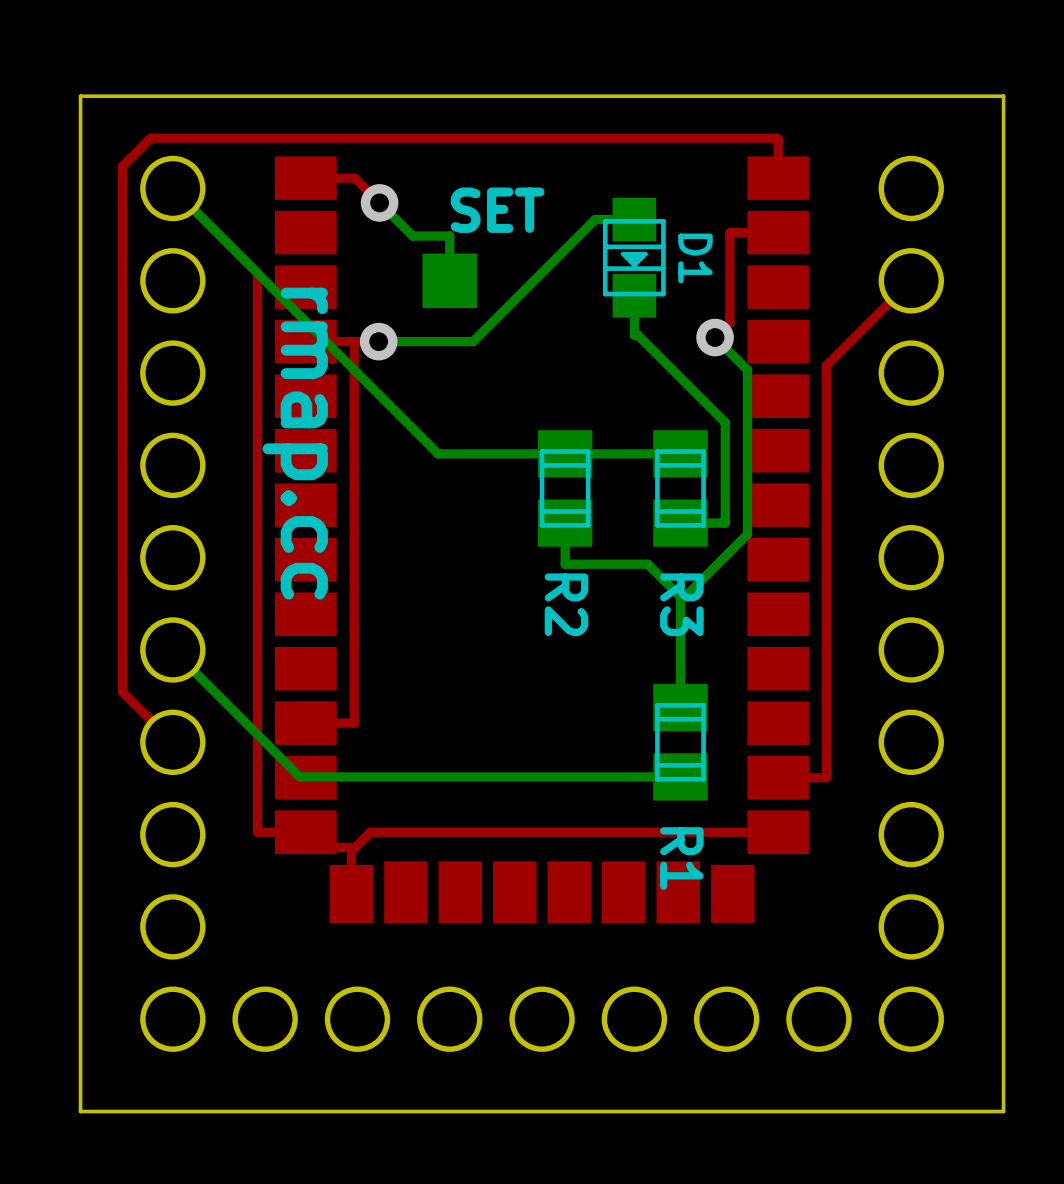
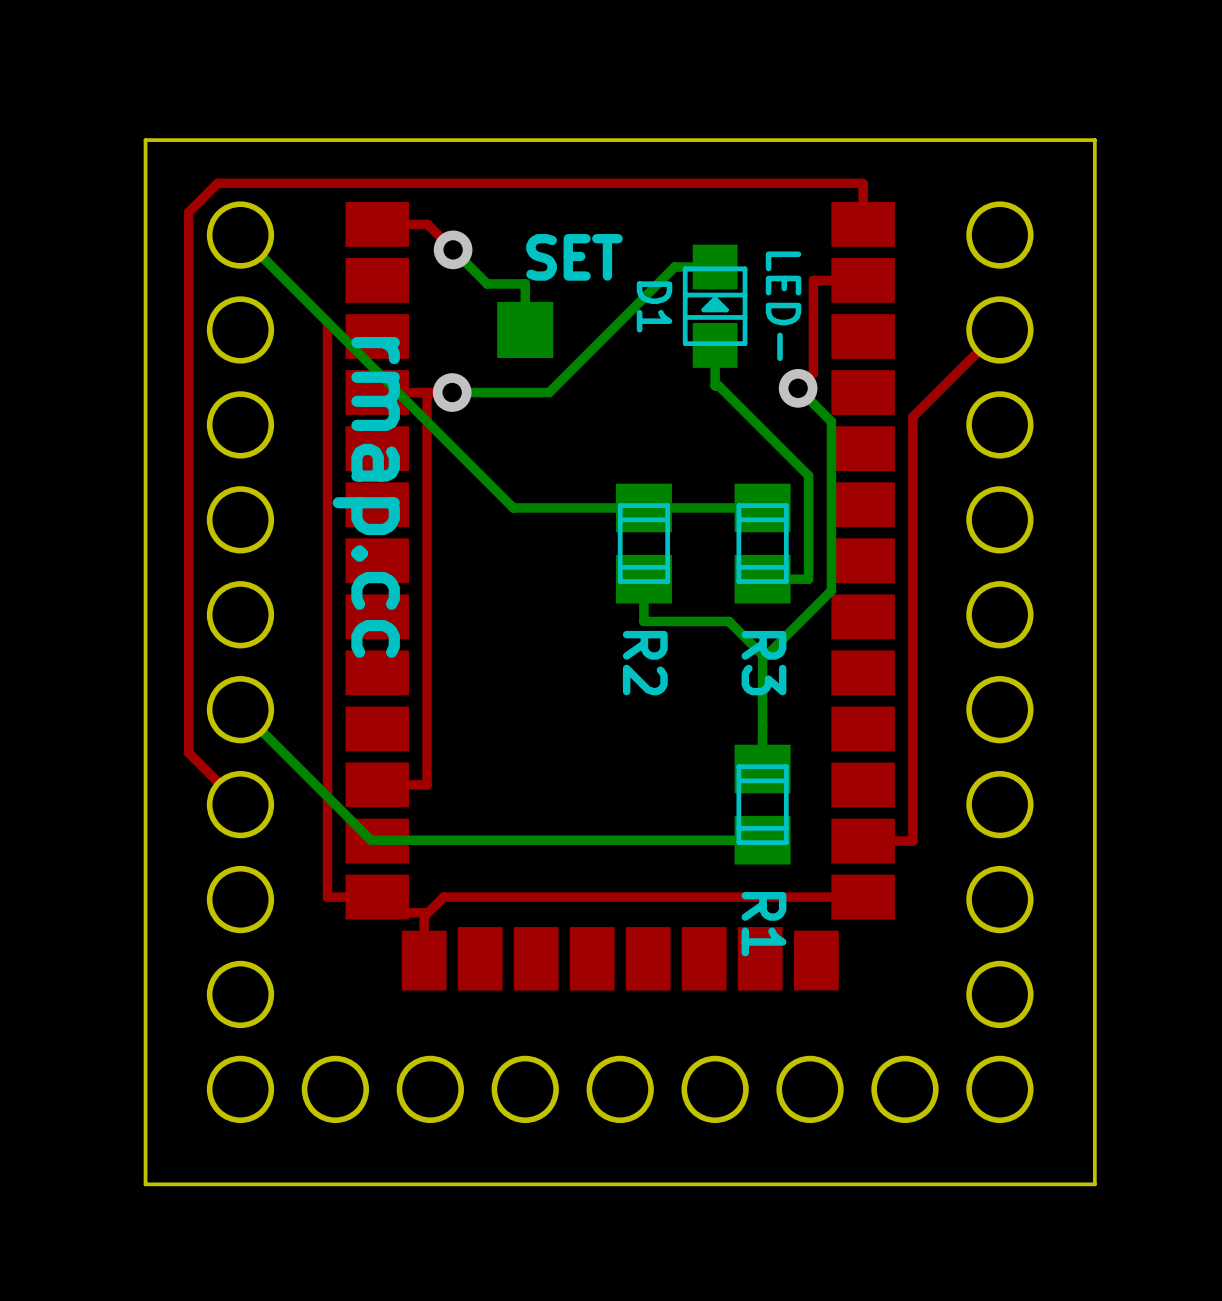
D1 rotation: 0° (634, 257) -> 180° (715, 306)
D1 value: none -> LED- (783, 306)

